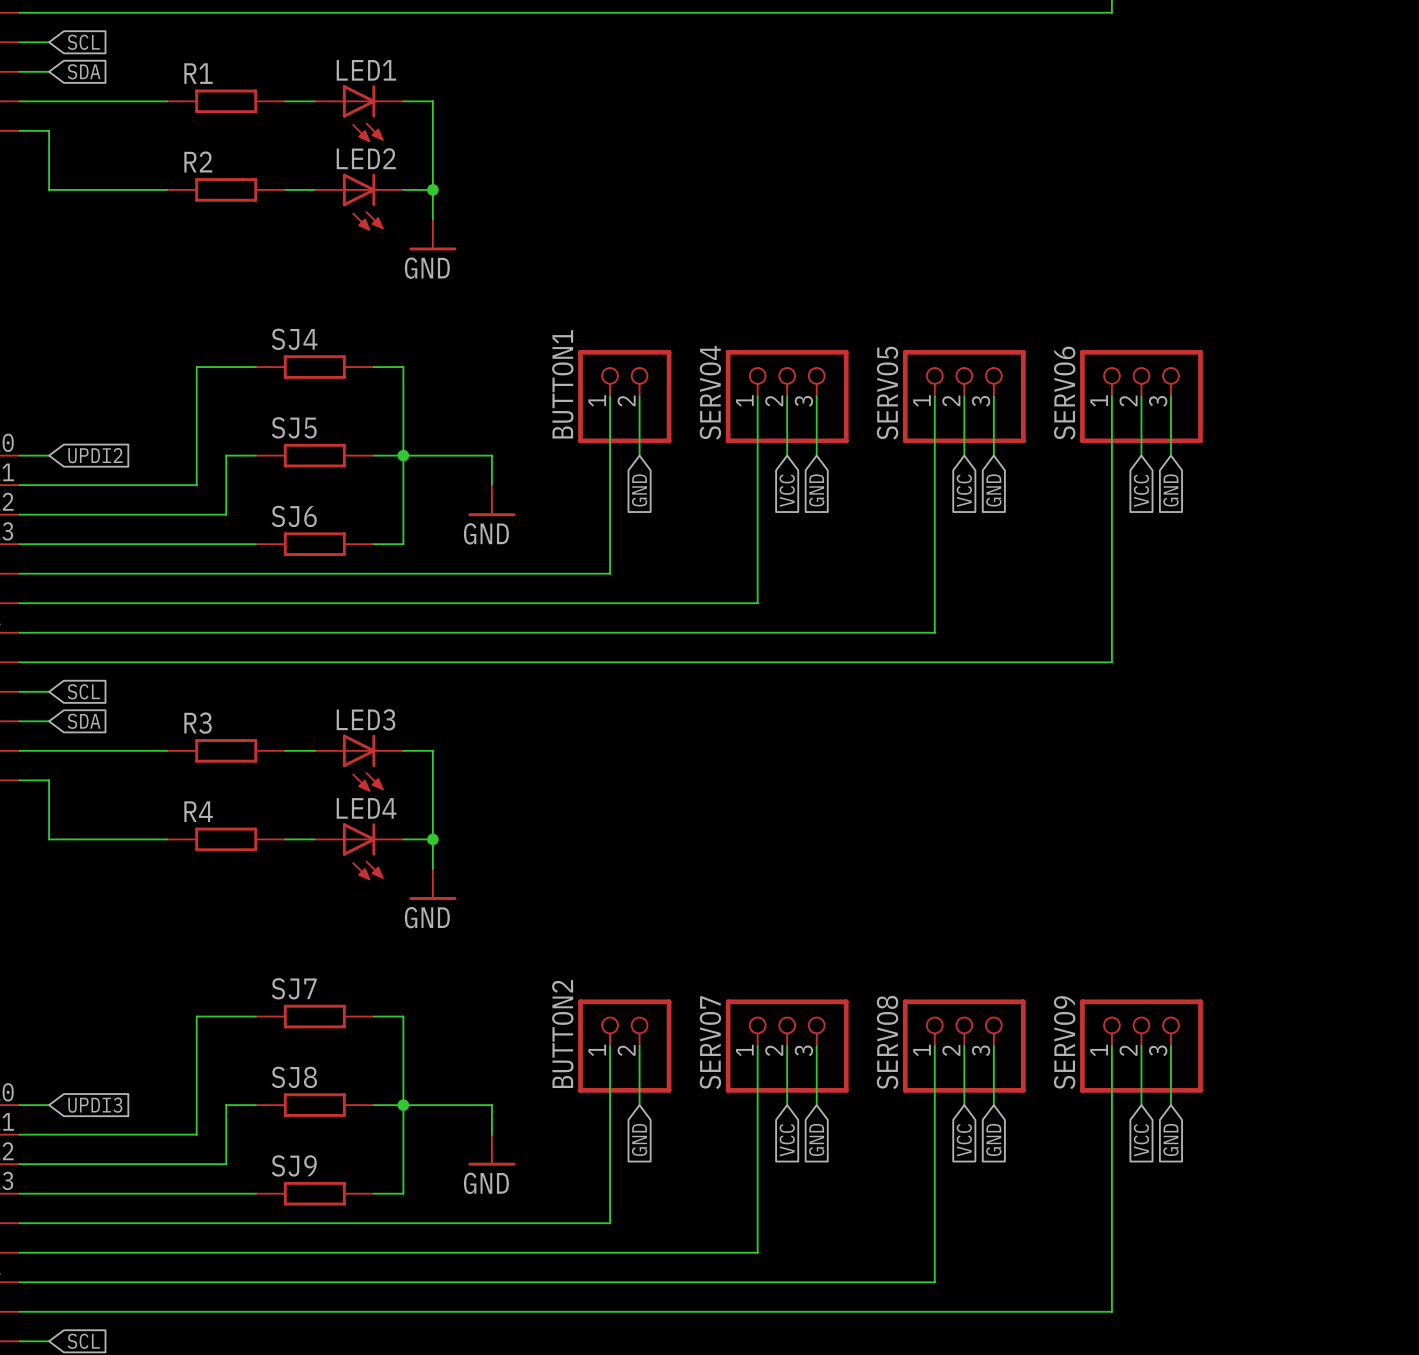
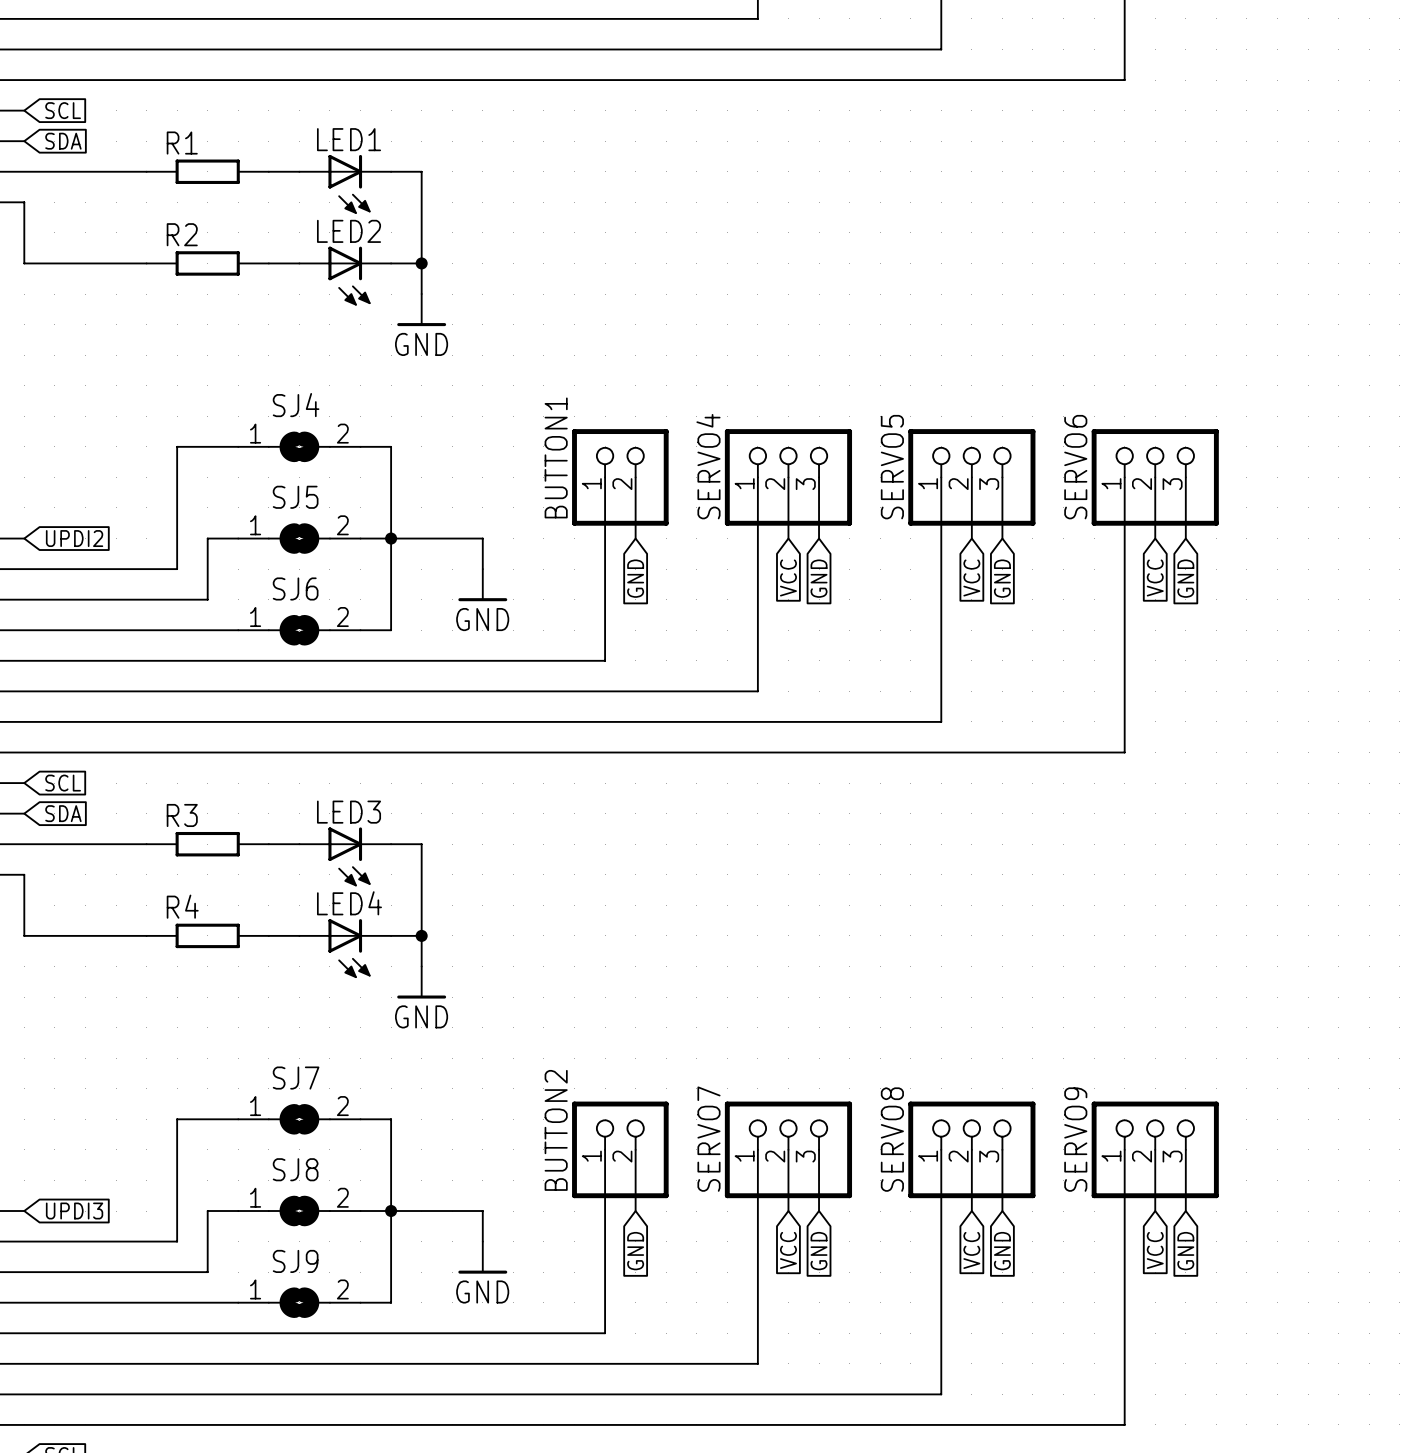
SJ4 symbol: [255, 355, 374, 379] -> [238, 431, 361, 463]
SJ5 symbol: [255, 443, 374, 468] -> [238, 523, 361, 554]
SJ6 symbol: [255, 532, 374, 556] -> [238, 614, 361, 646]
SJ7 symbol: [255, 1004, 374, 1029] -> [238, 1104, 361, 1135]
SJ8 symbol: [255, 1093, 374, 1117] -> [238, 1195, 361, 1227]
SJ9 symbol: [255, 1181, 374, 1206] -> [238, 1287, 361, 1318]

